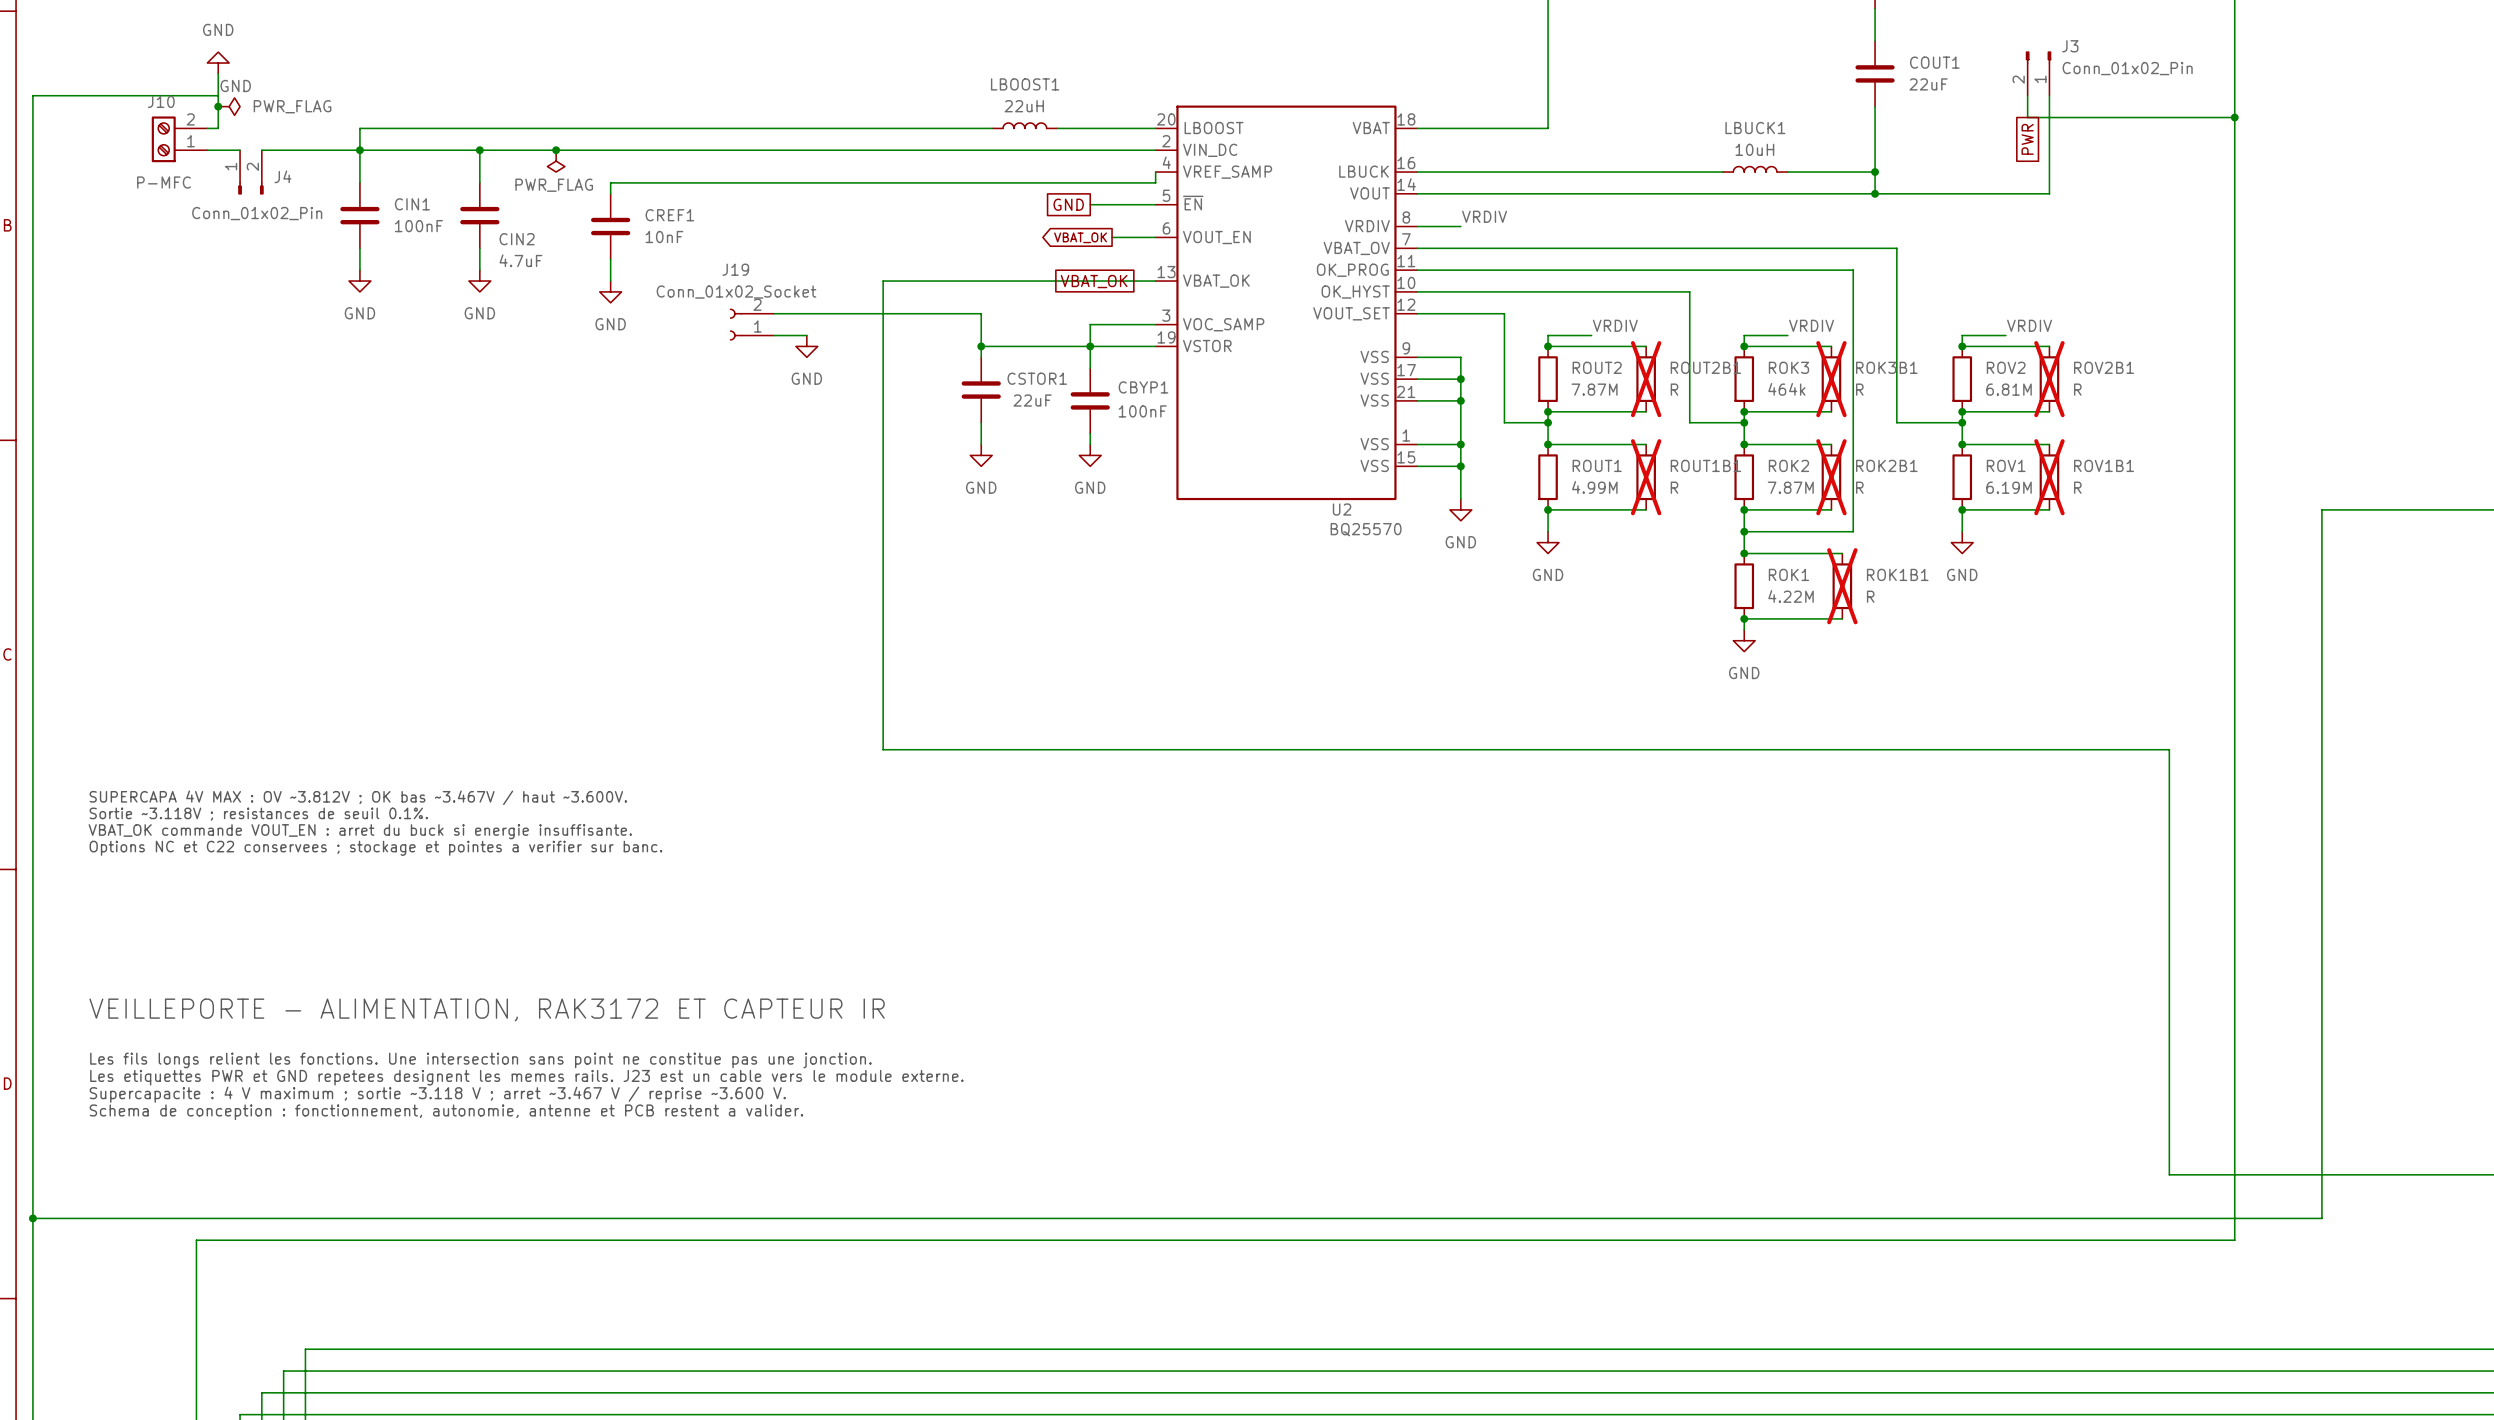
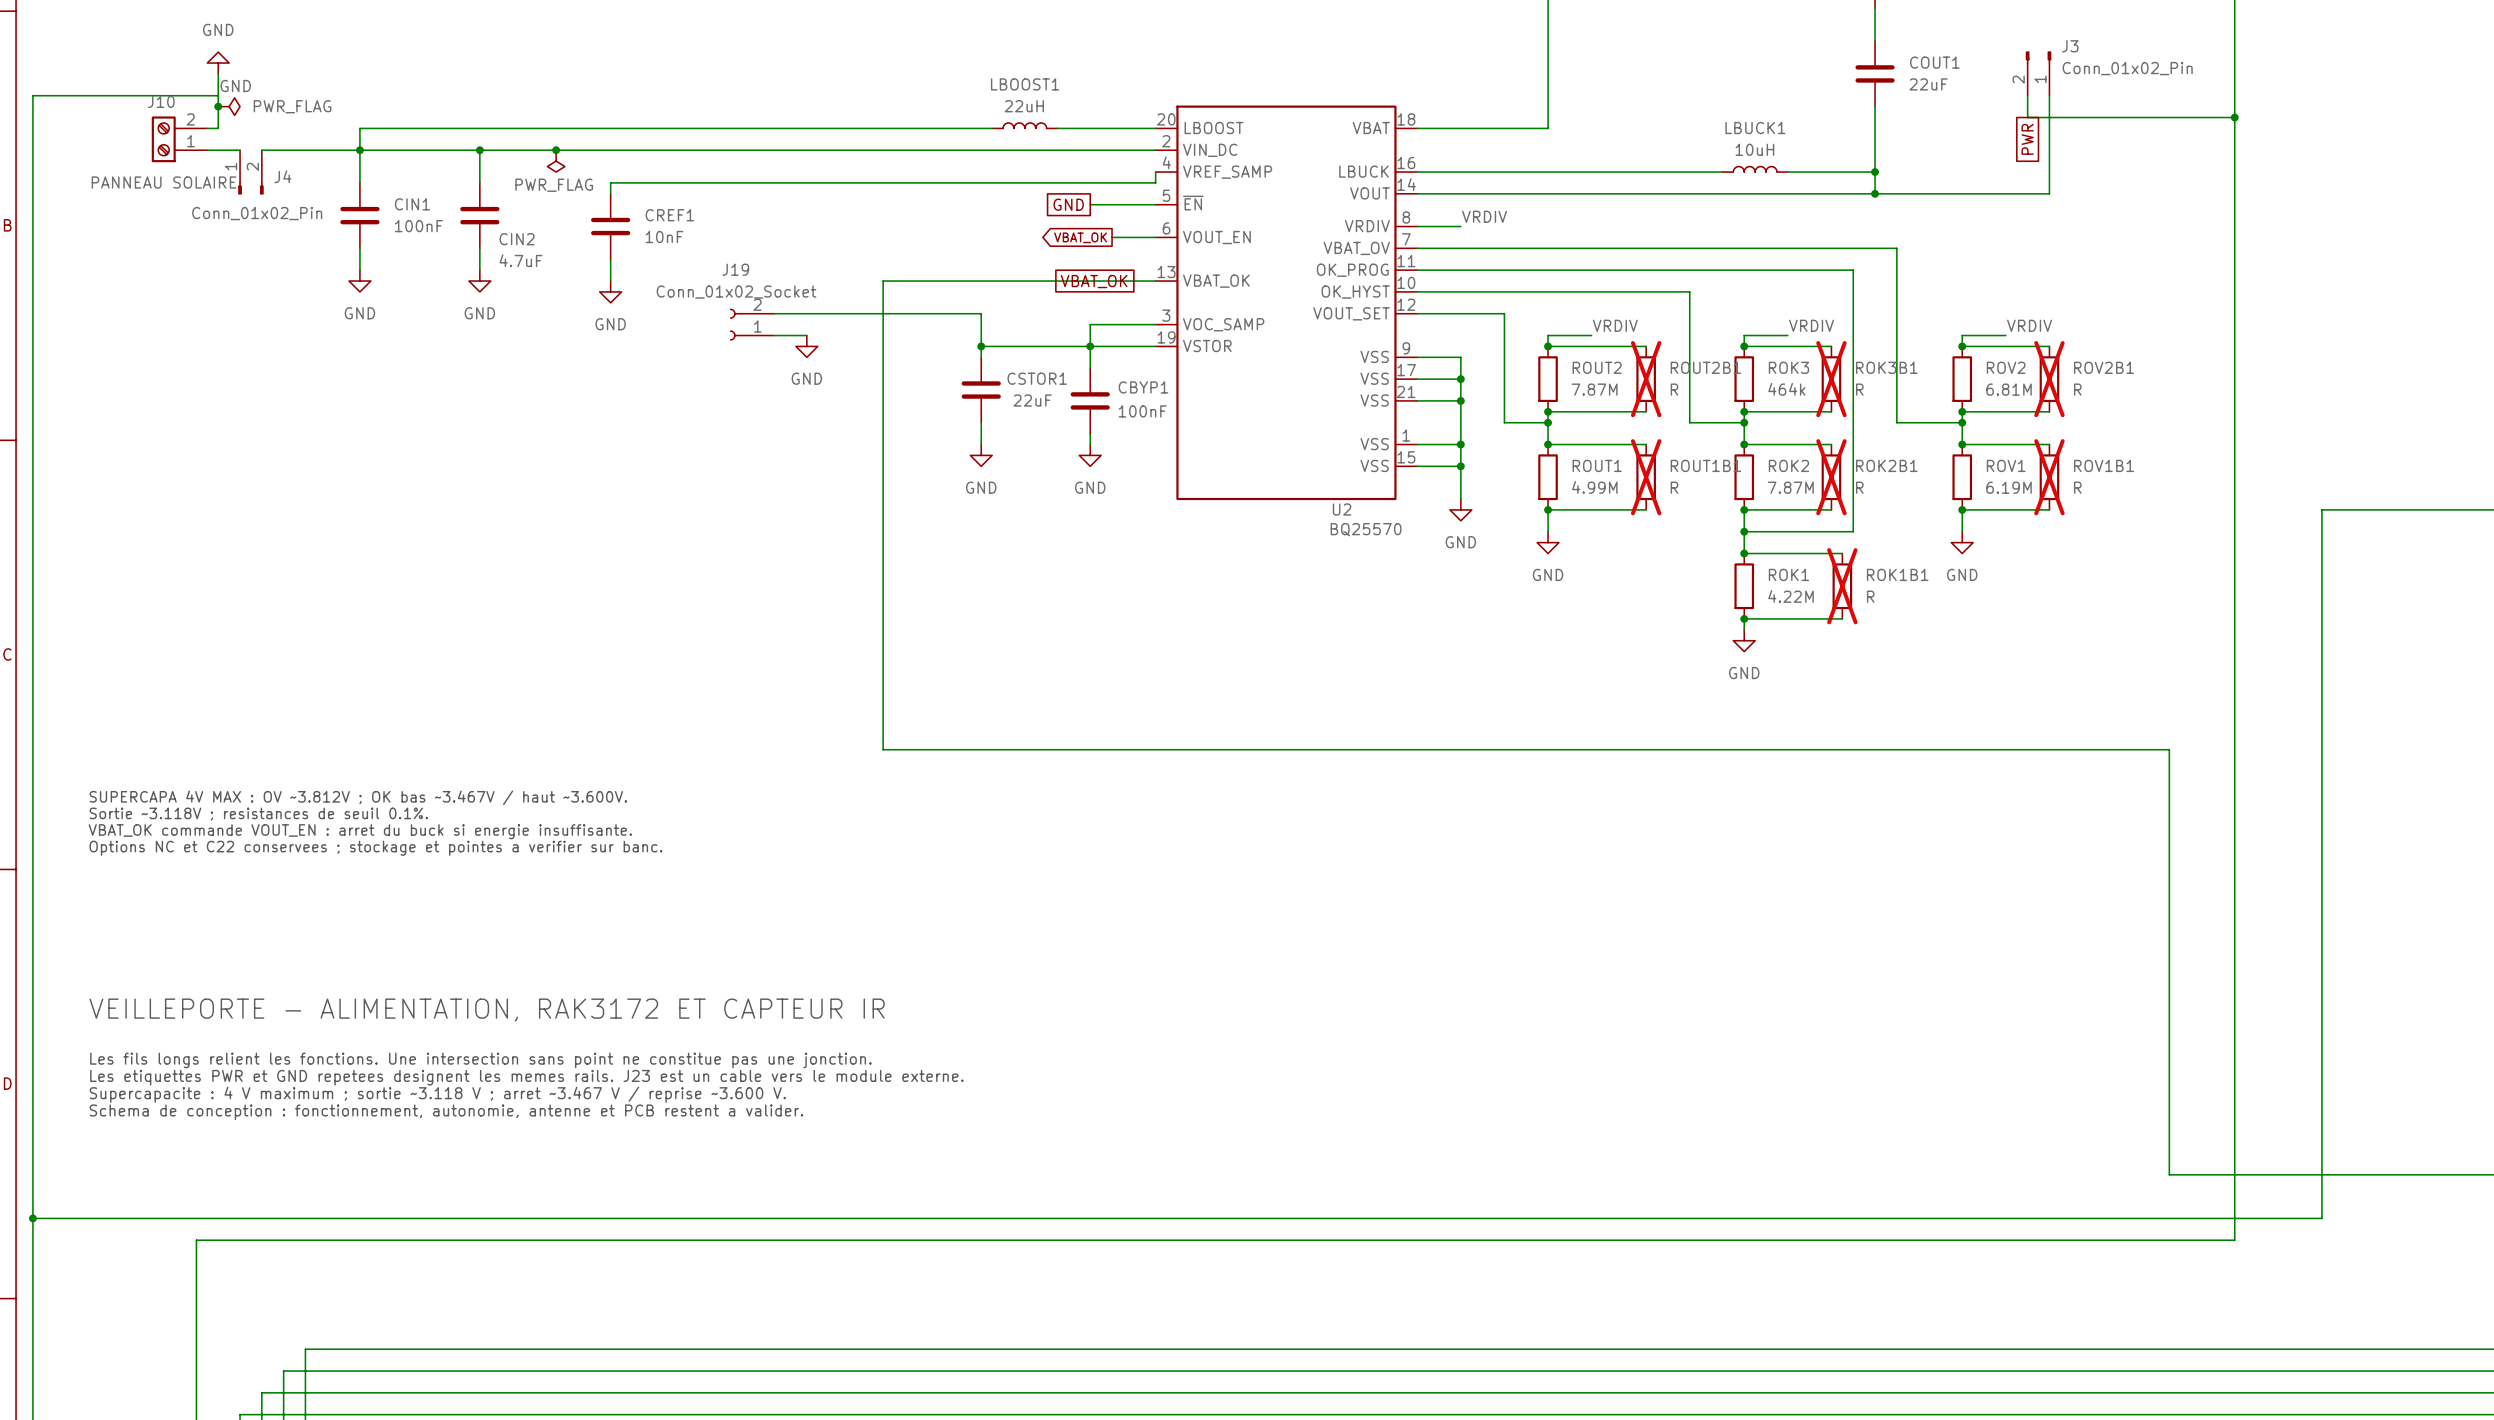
J10 value: P-MFC (164, 182) -> PANNEAU SOLAIRE (164, 182)

